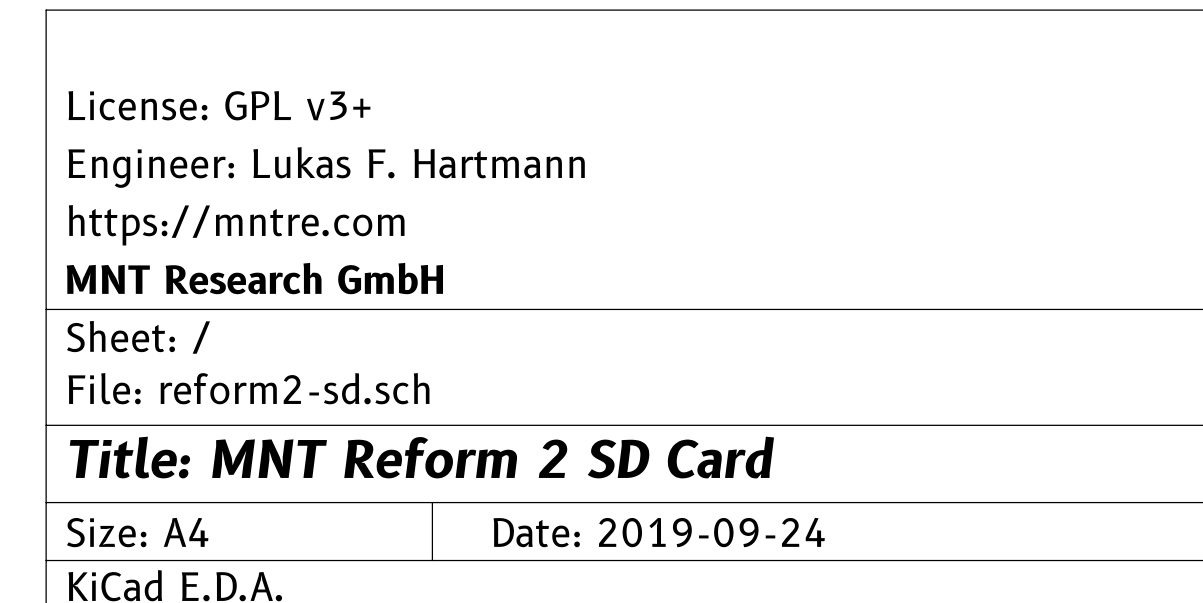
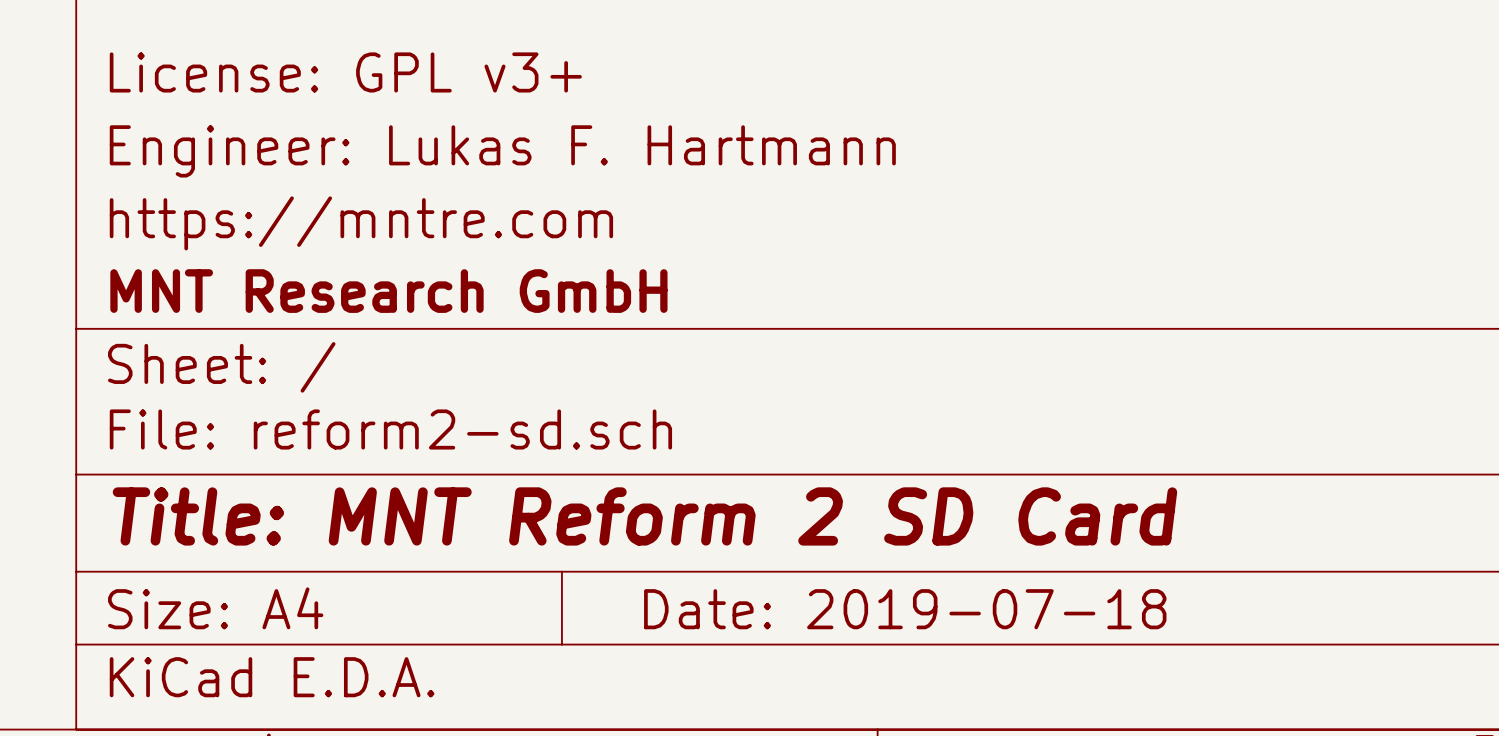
title block: Date: 2019-09-24 (659, 532) -> Date: 2019-07-18 (905, 609)

